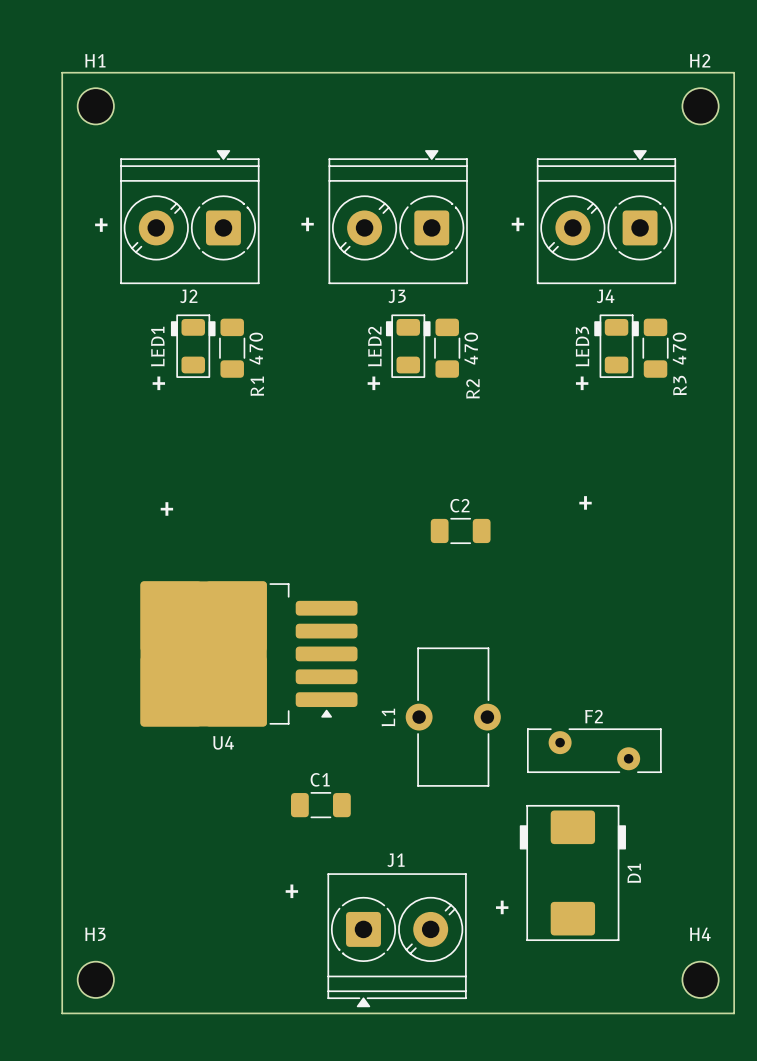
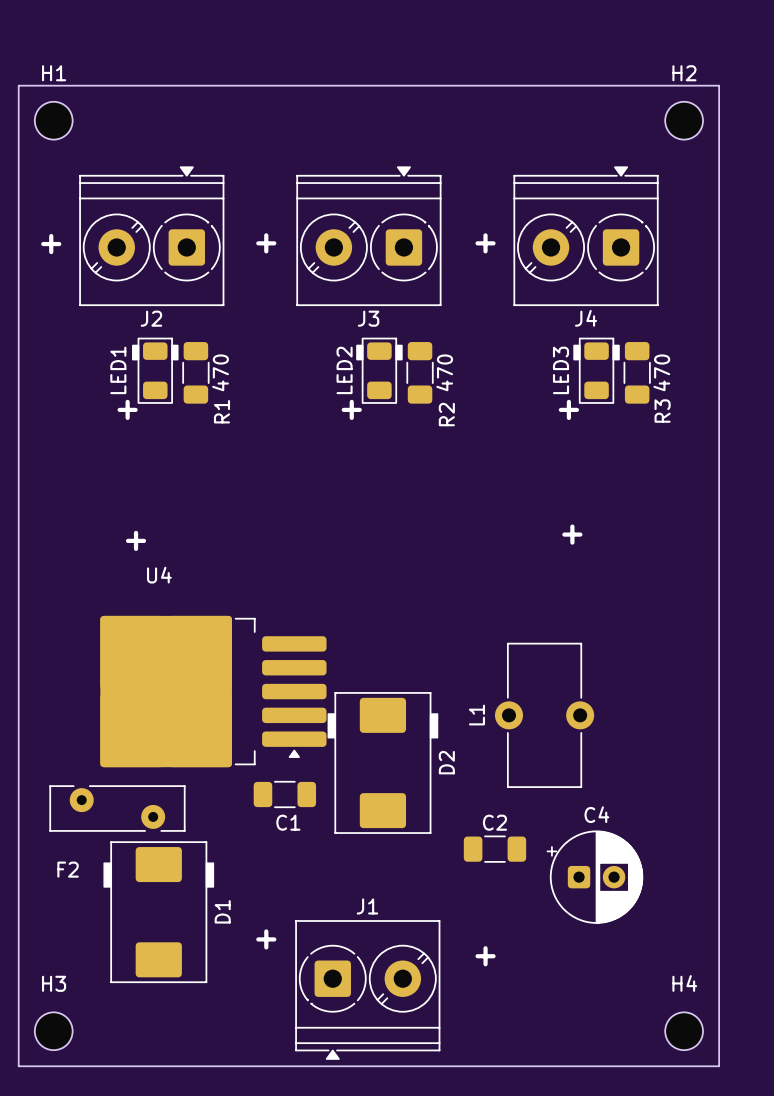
C2 position: (460, 530) -> (494, 849)
F2 name position: F2 (594, 716) -> F2 (68, 869)
L1 position: (453, 717) -> (544, 715)
D2: none -> (382, 762)
F2 footprint: [527, 728, 662, 774] -> [49, 785, 186, 832]
U4 name position: U4 (223, 742) -> U4 (159, 575)
C1 position: (320, 805) -> (284, 794)
C4: none -> (594, 877)
D1 position: (572, 872) -> (158, 912)

